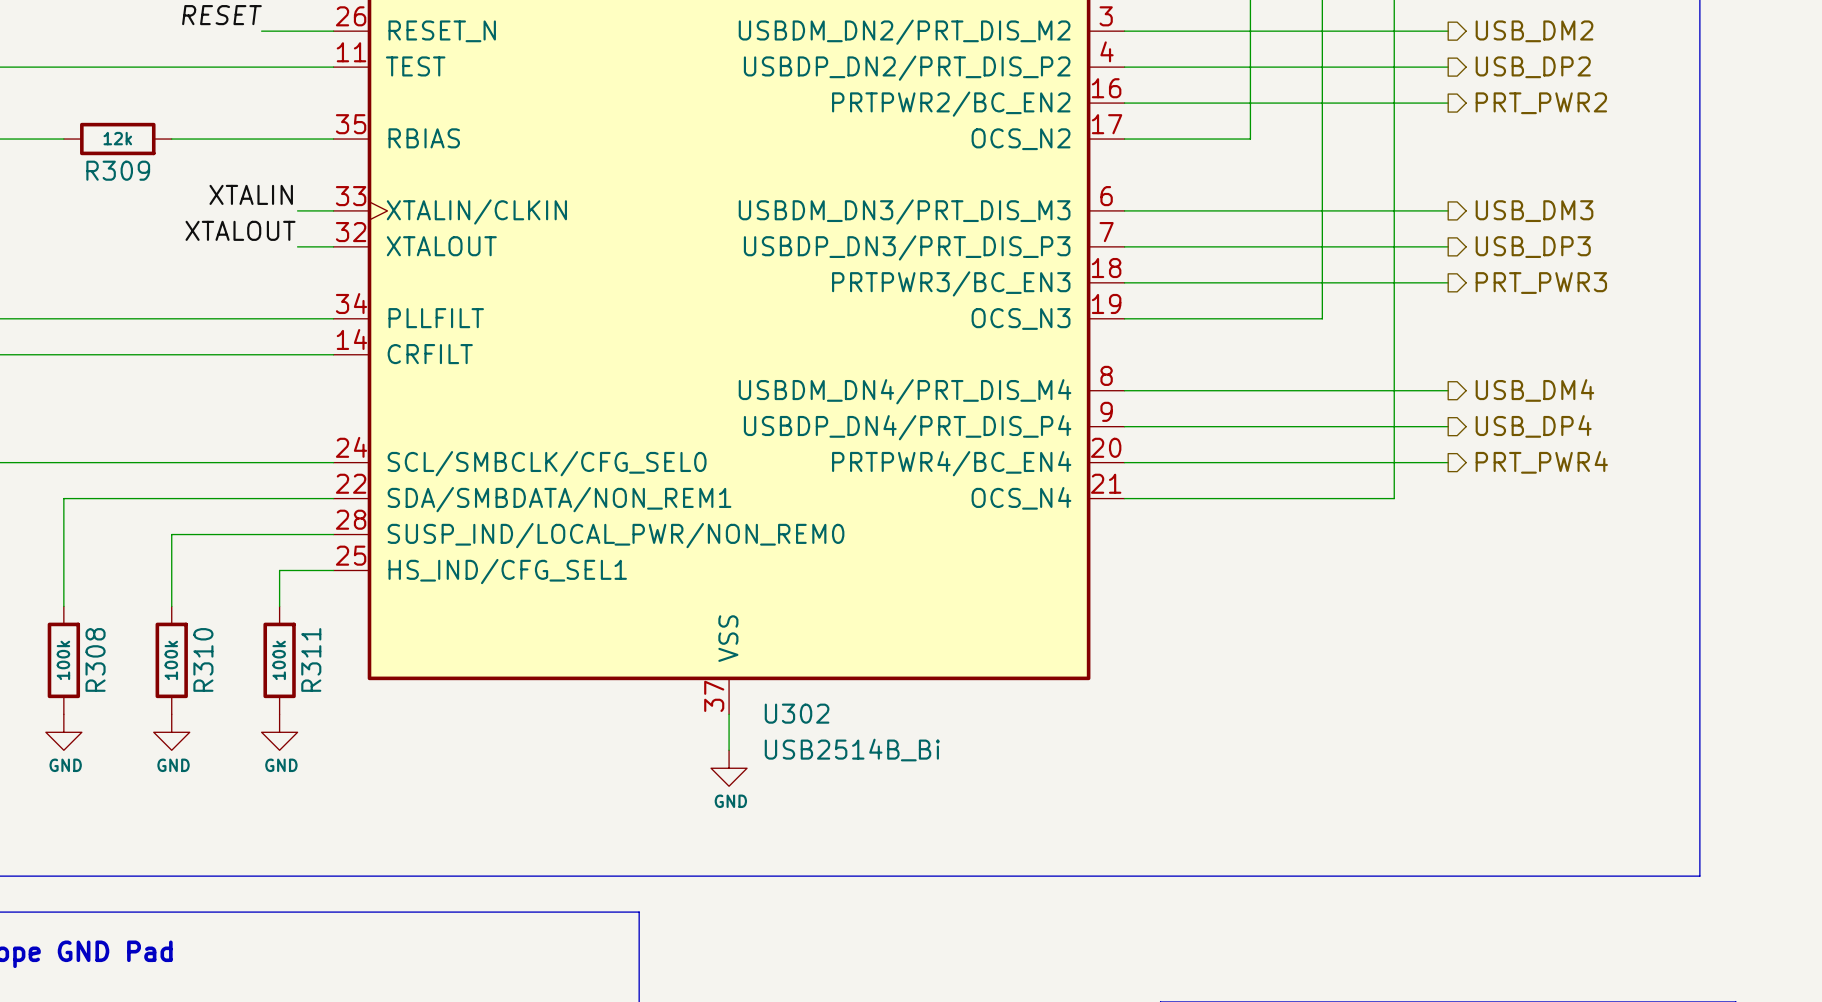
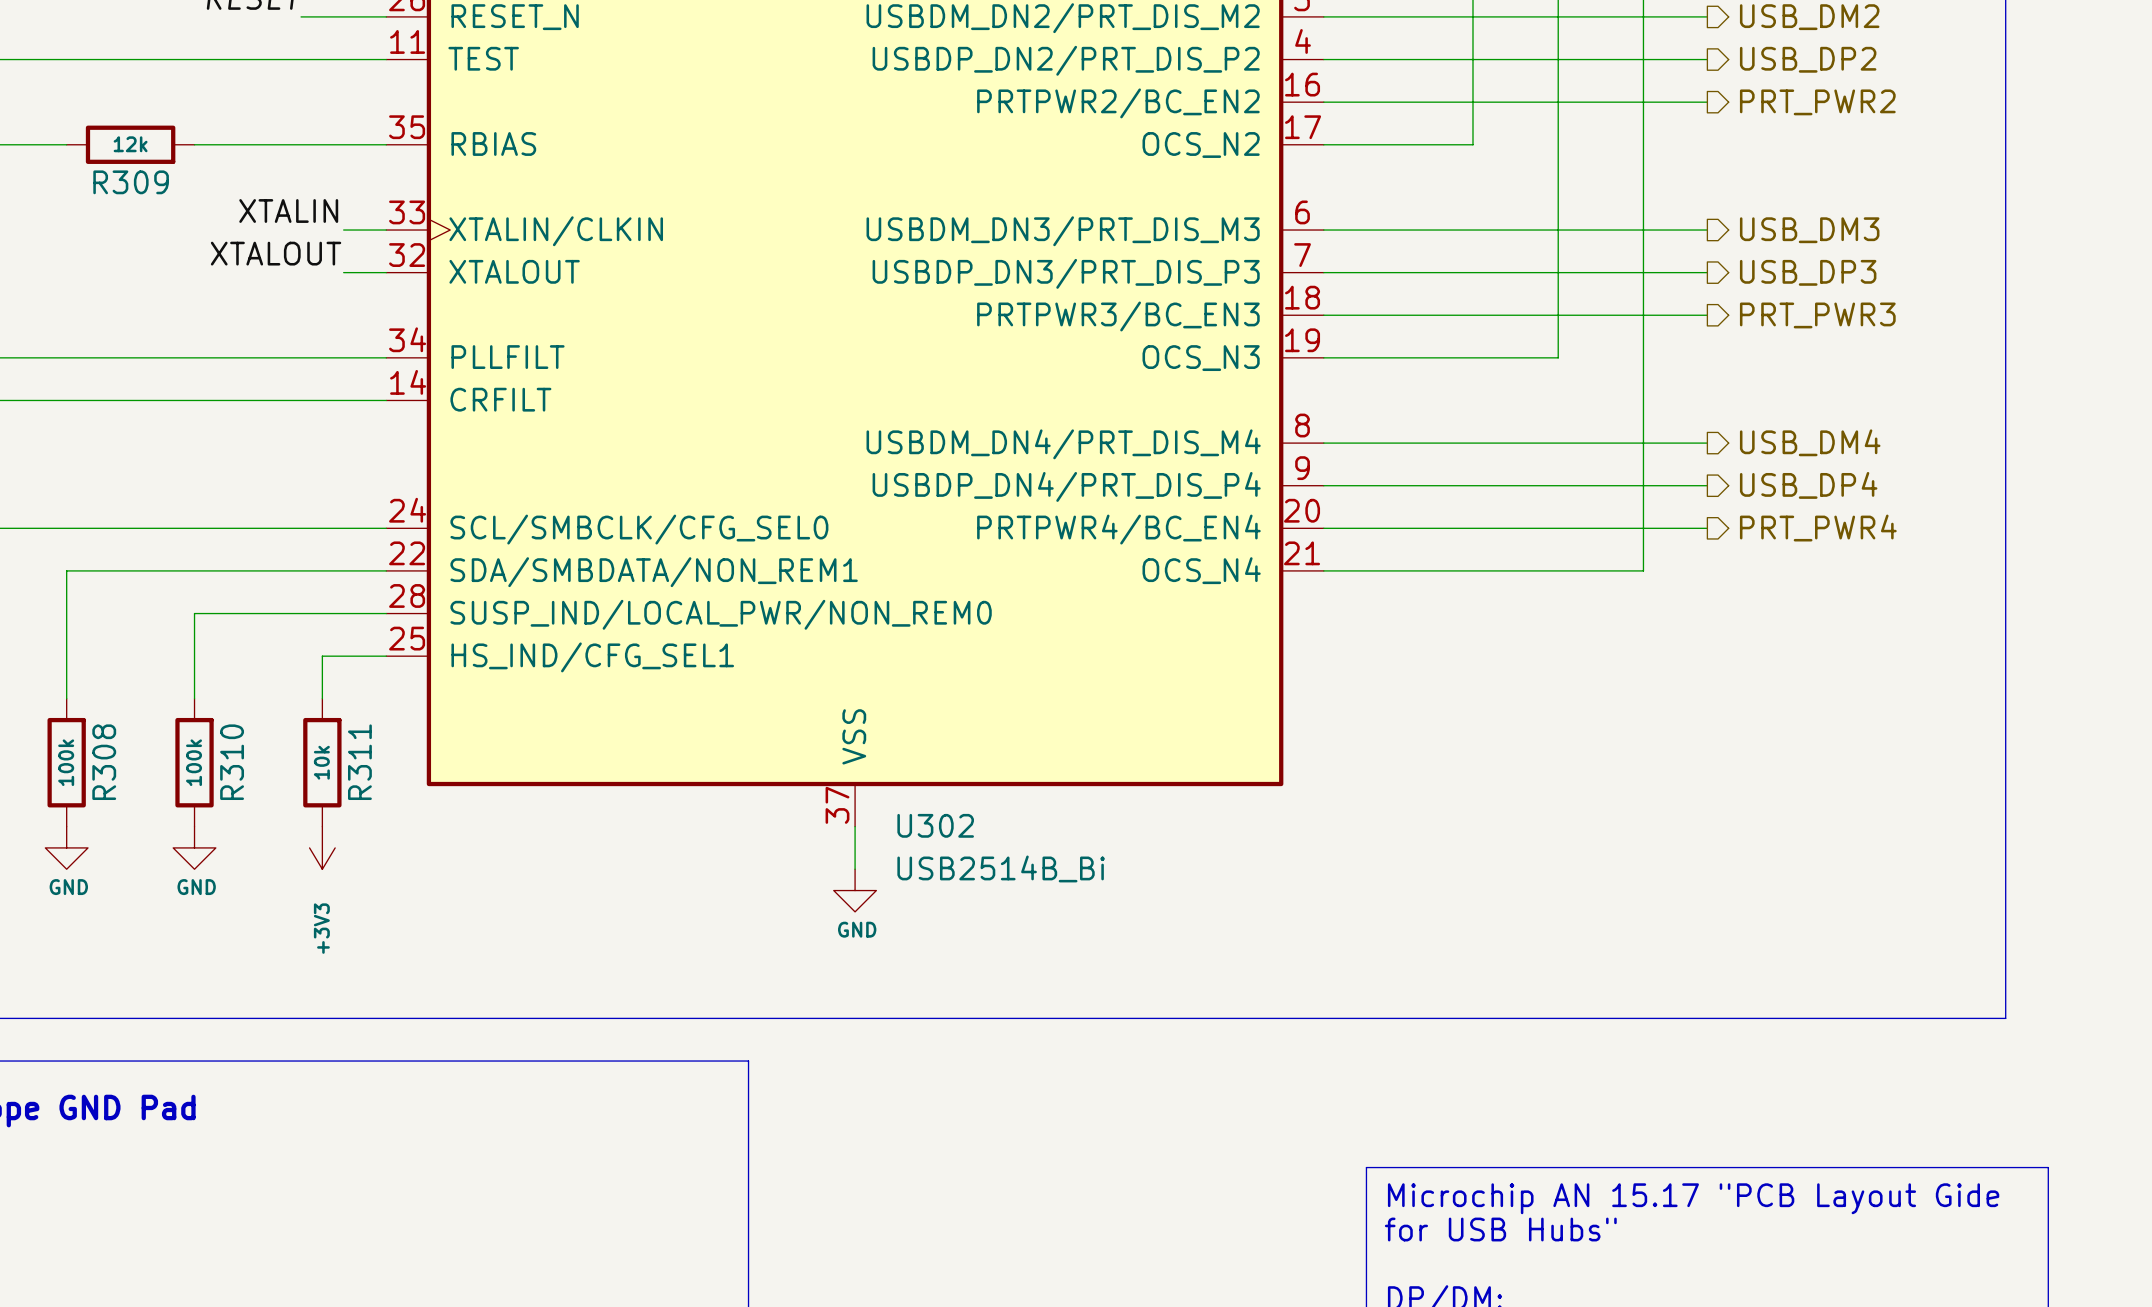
R311 value: 100k (279, 660) -> 10k (321, 762)
power symbol: GND (279, 732) -> +3V3 (322, 847)

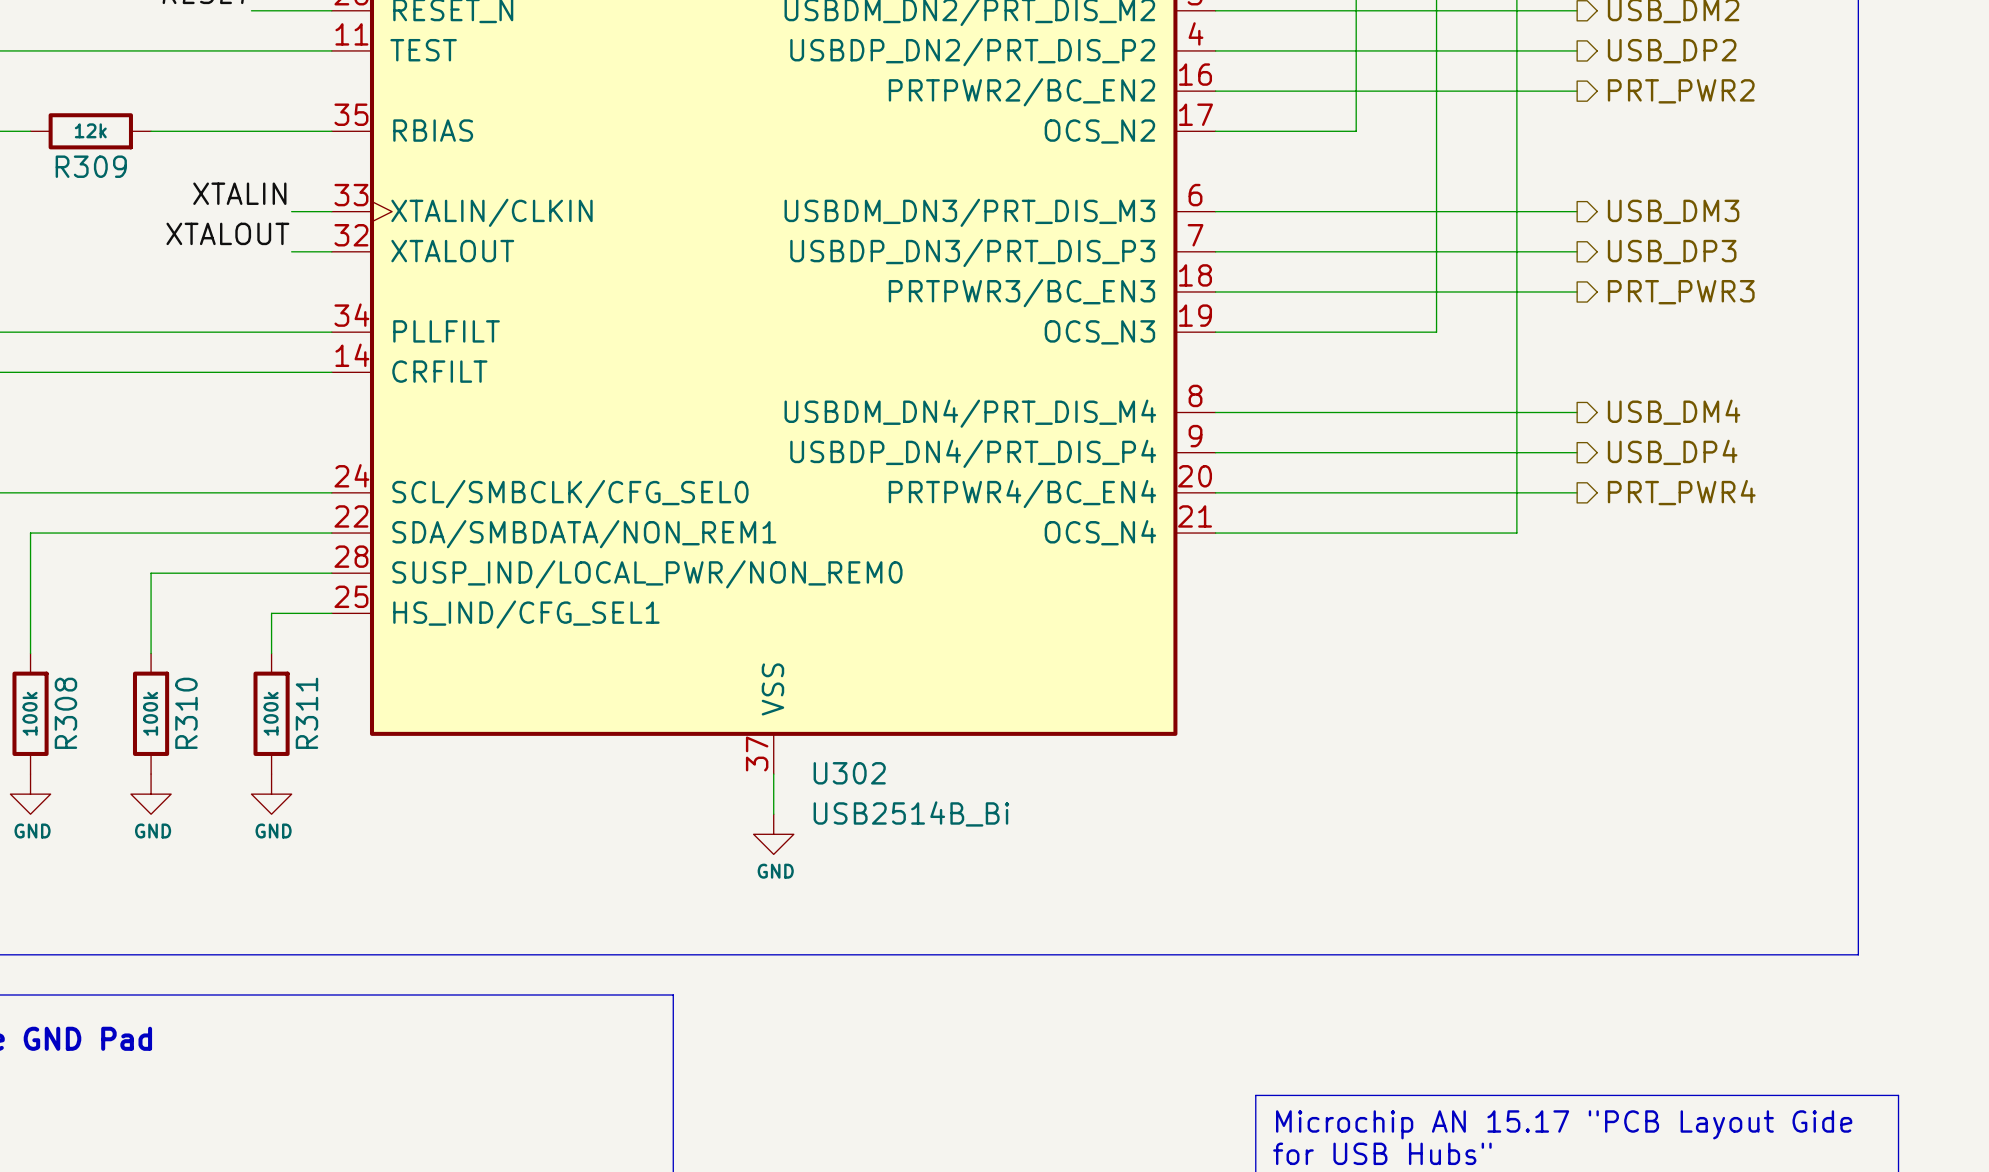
R311 value: 10k (321, 762) -> 100k (271, 713)
power symbol: +3V3 (322, 847) -> GND (271, 794)

